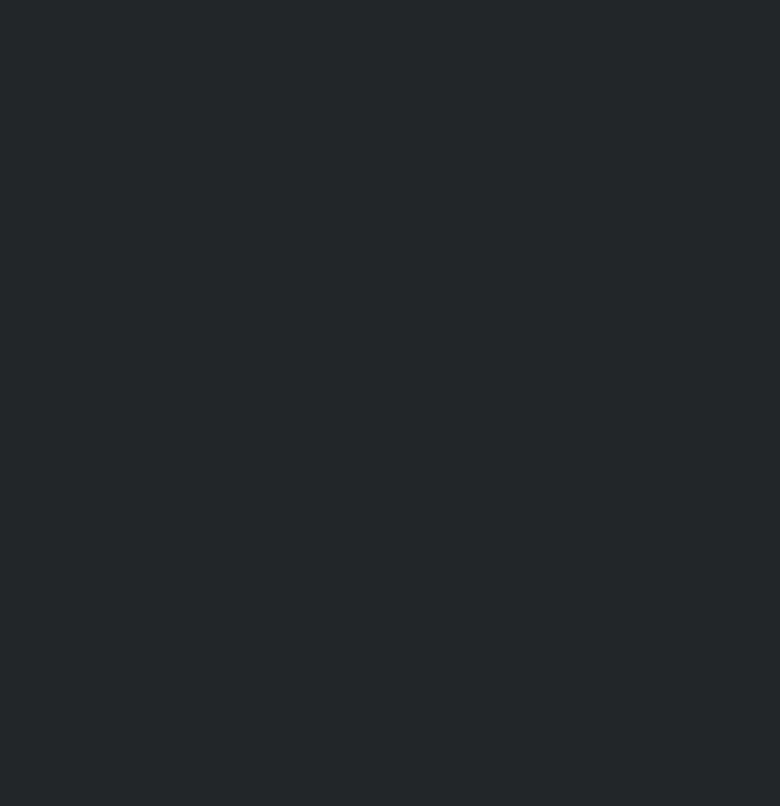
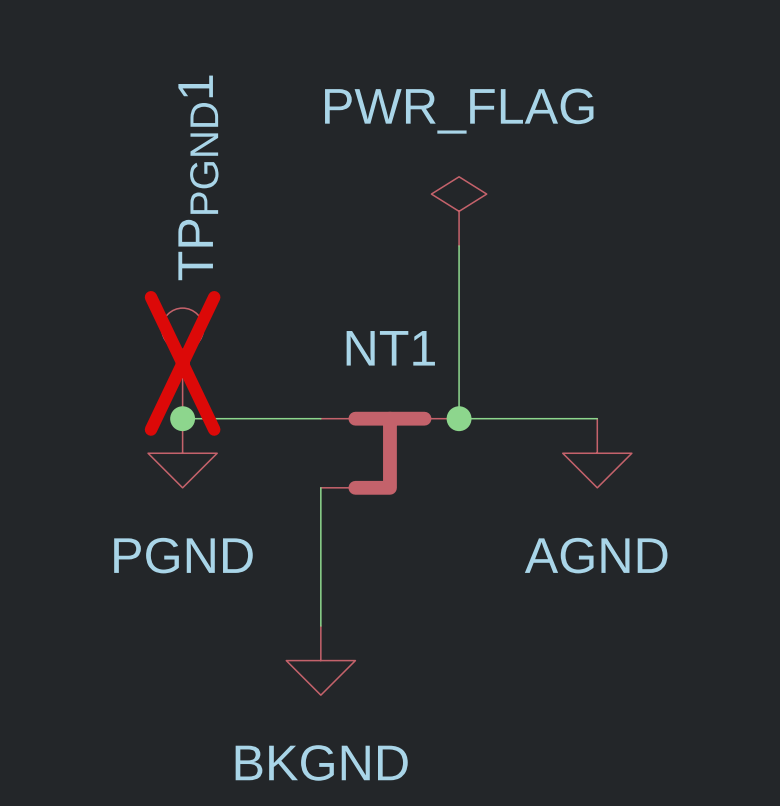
power symbol: none -> PWR_FLAG (459, 211)
wire: none -> (459, 245) (459, 418) (597, 418)
TPPGND1: none -> (182, 363)
wire: none -> (182, 418) (320, 418)
junction: none -> (182, 418)
junction: none -> (459, 418)
power symbol: none -> PGND (182, 453)
NT1: none -> (389, 453)
power symbol: none -> AGND (597, 453)
wire: none -> (320, 487) (320, 626)
power symbol: none -> BKGND (320, 660)

